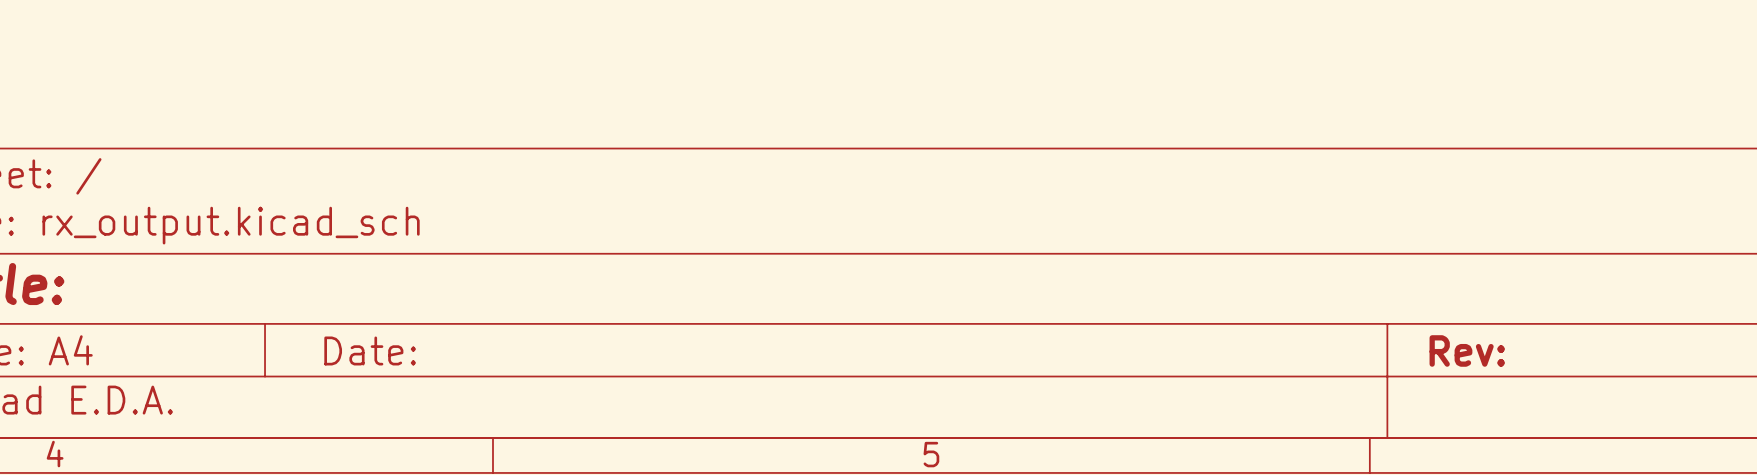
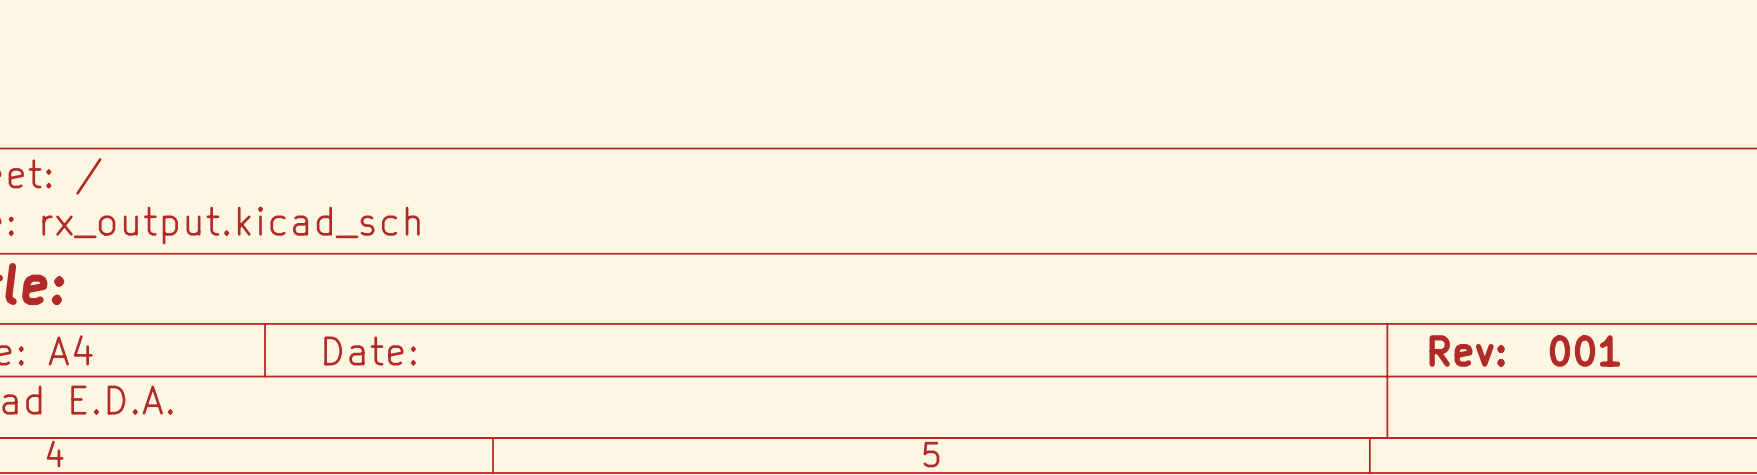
title block: Rev: (1467, 350) -> Rev: 001 (1524, 350)

